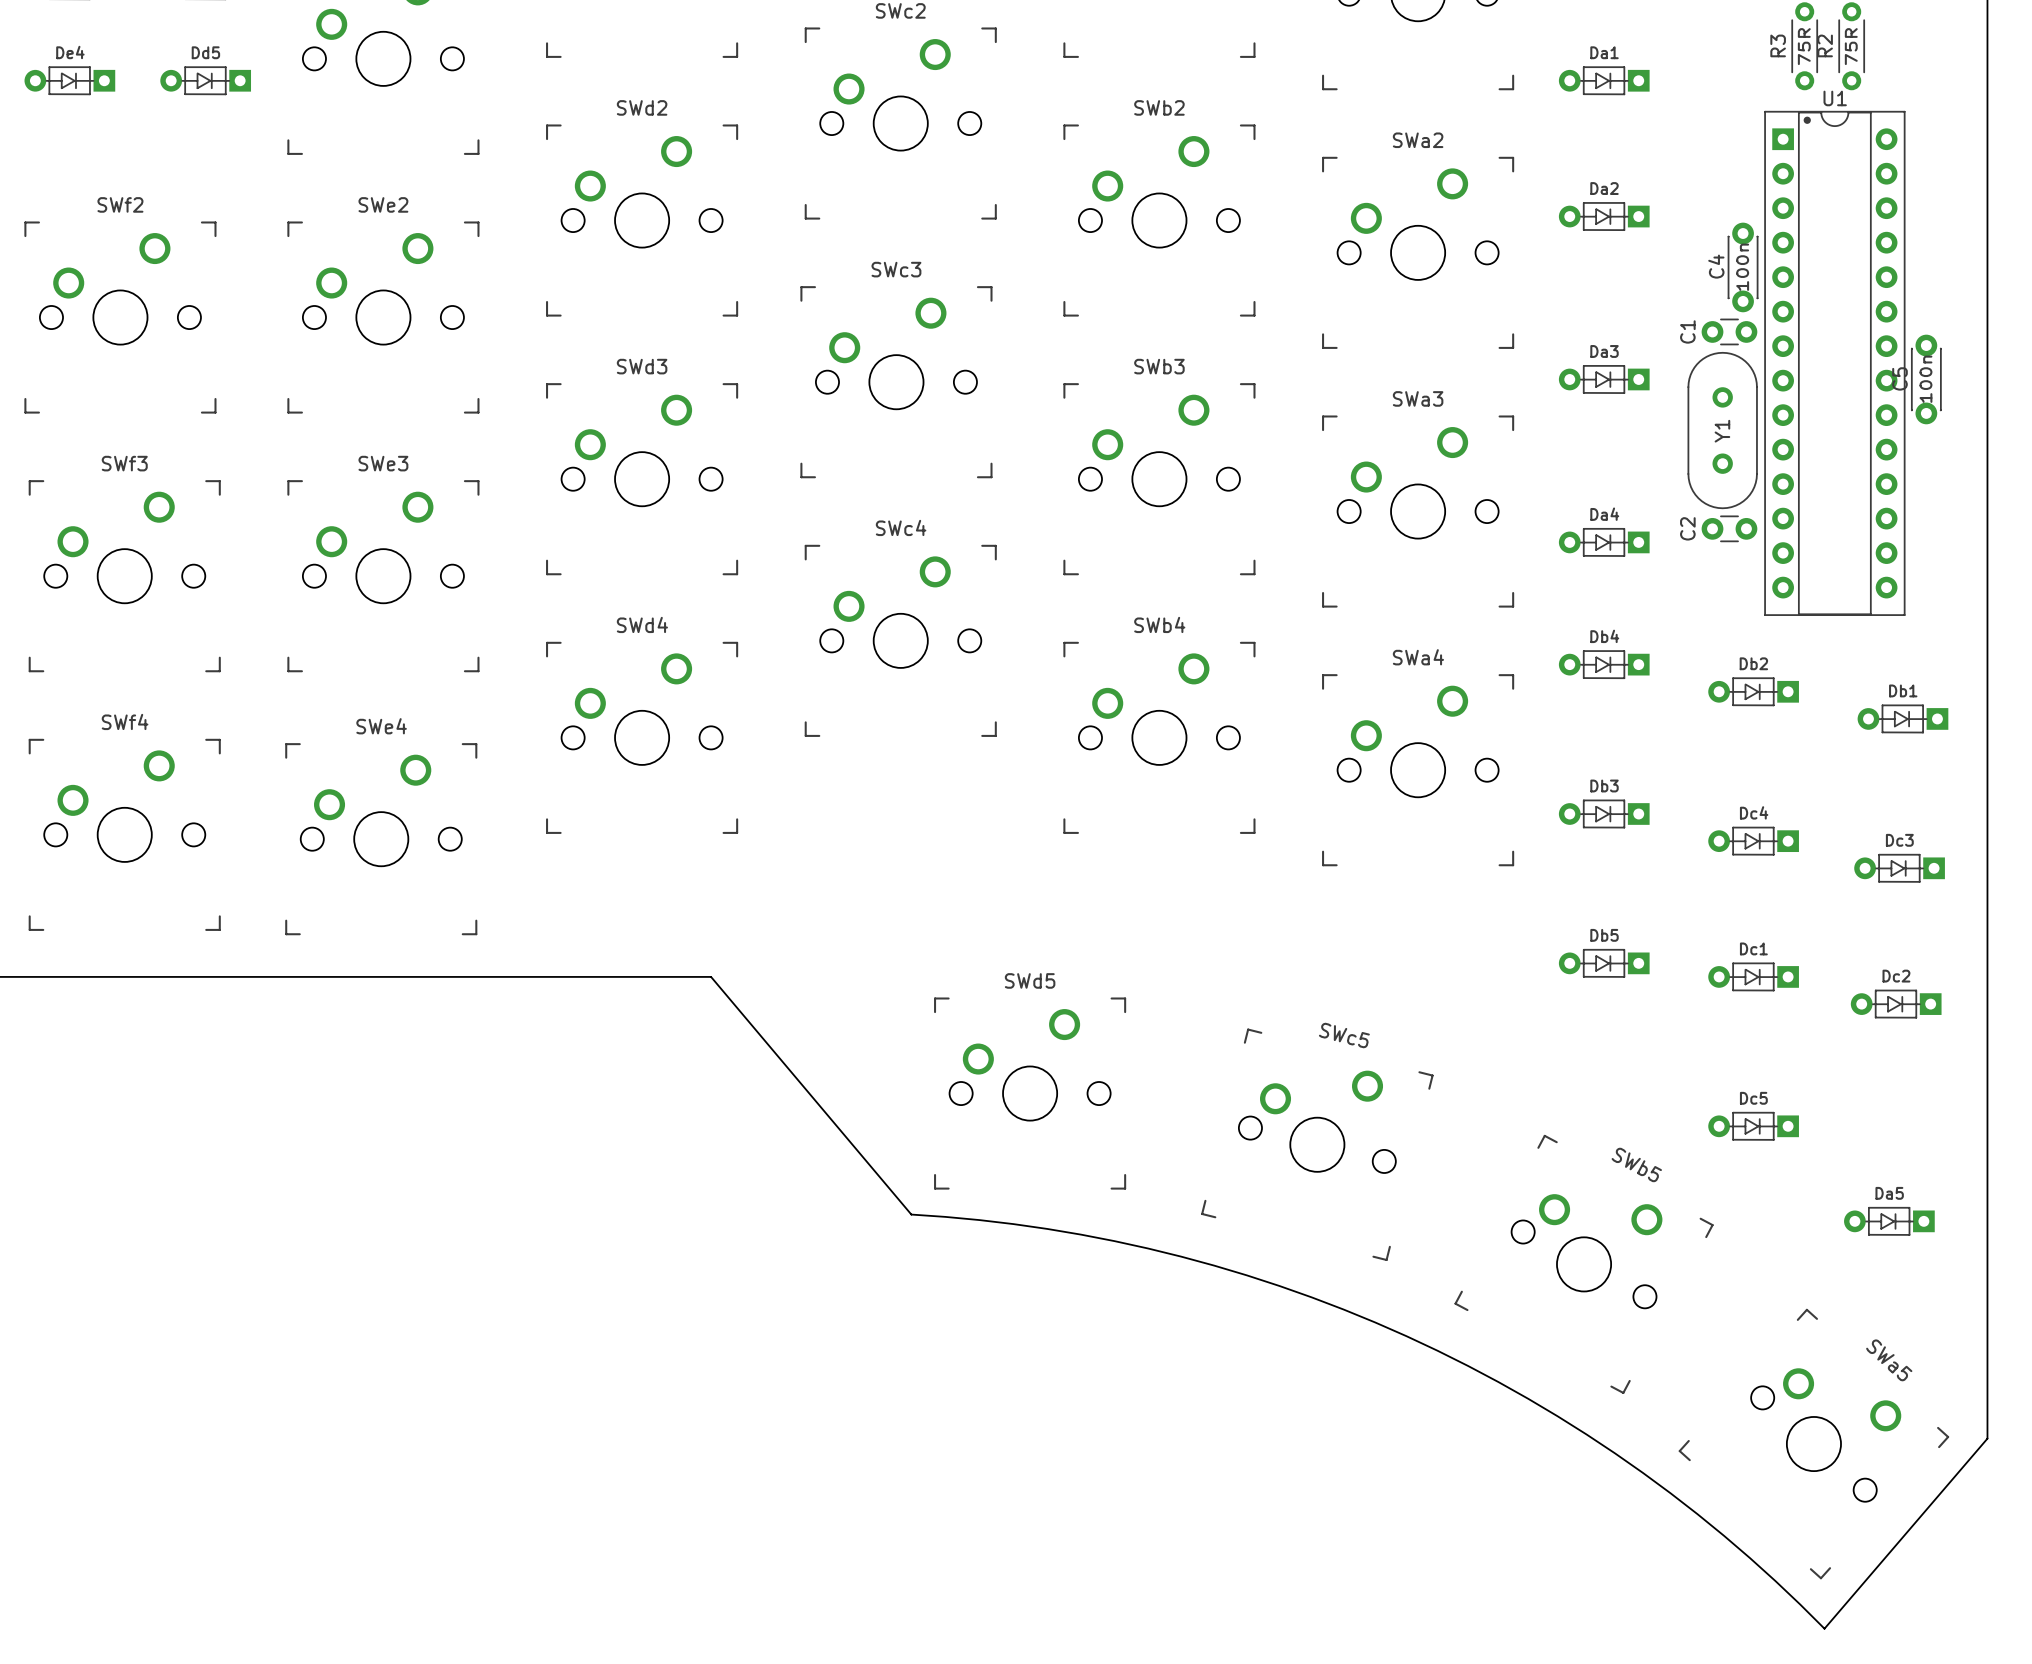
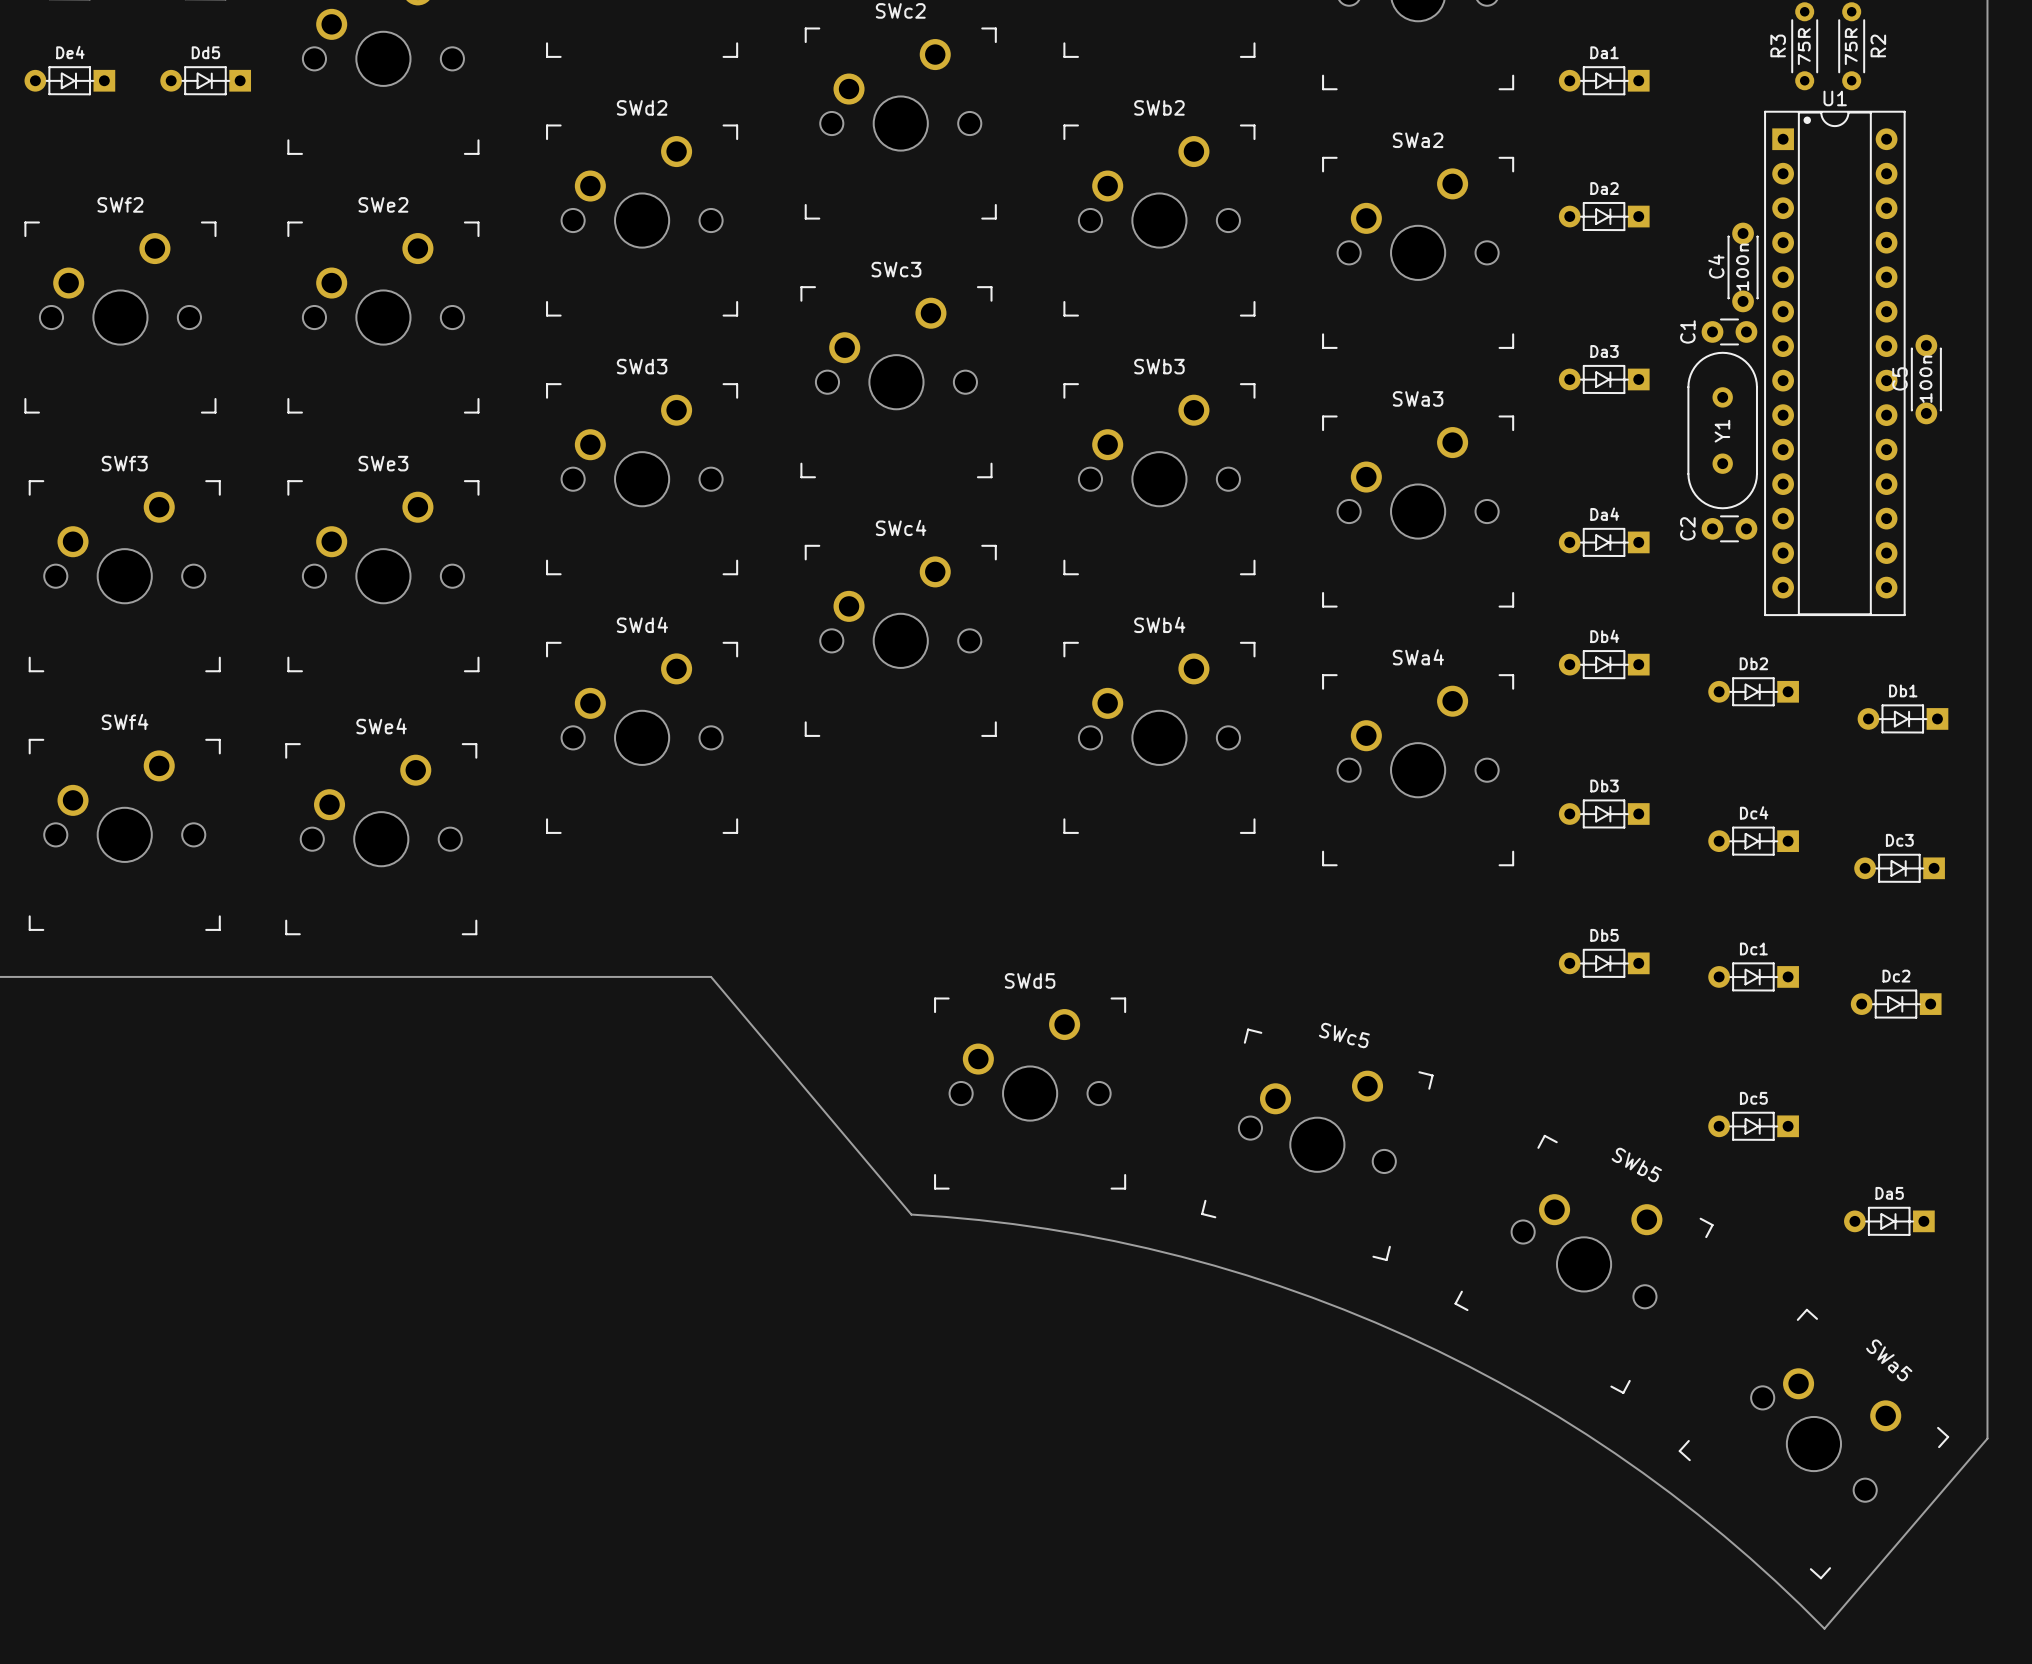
R2 name position: R2 (1825, 45) -> R2 (1878, 45)

